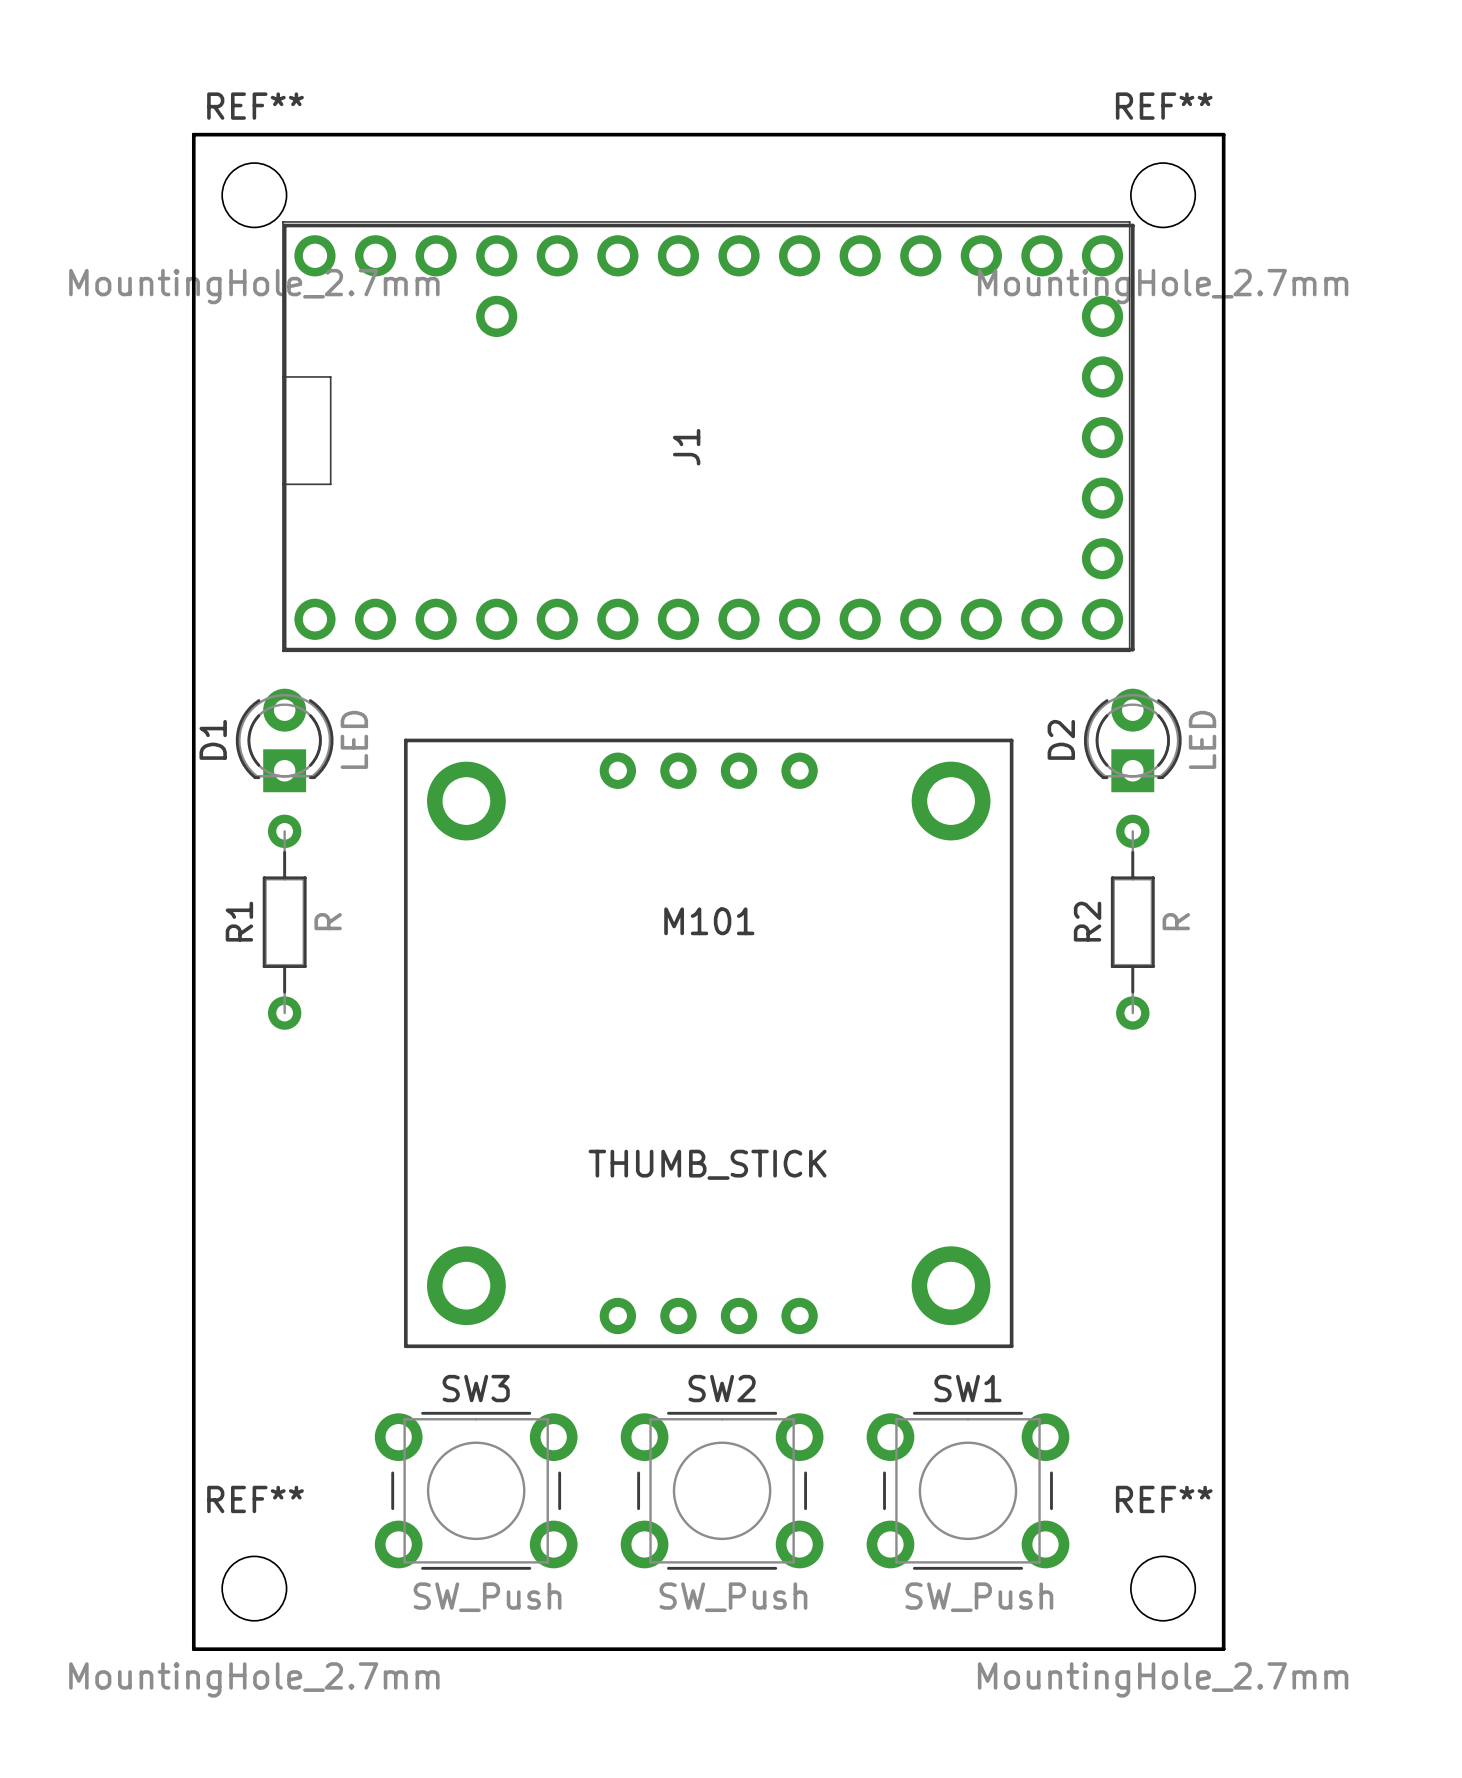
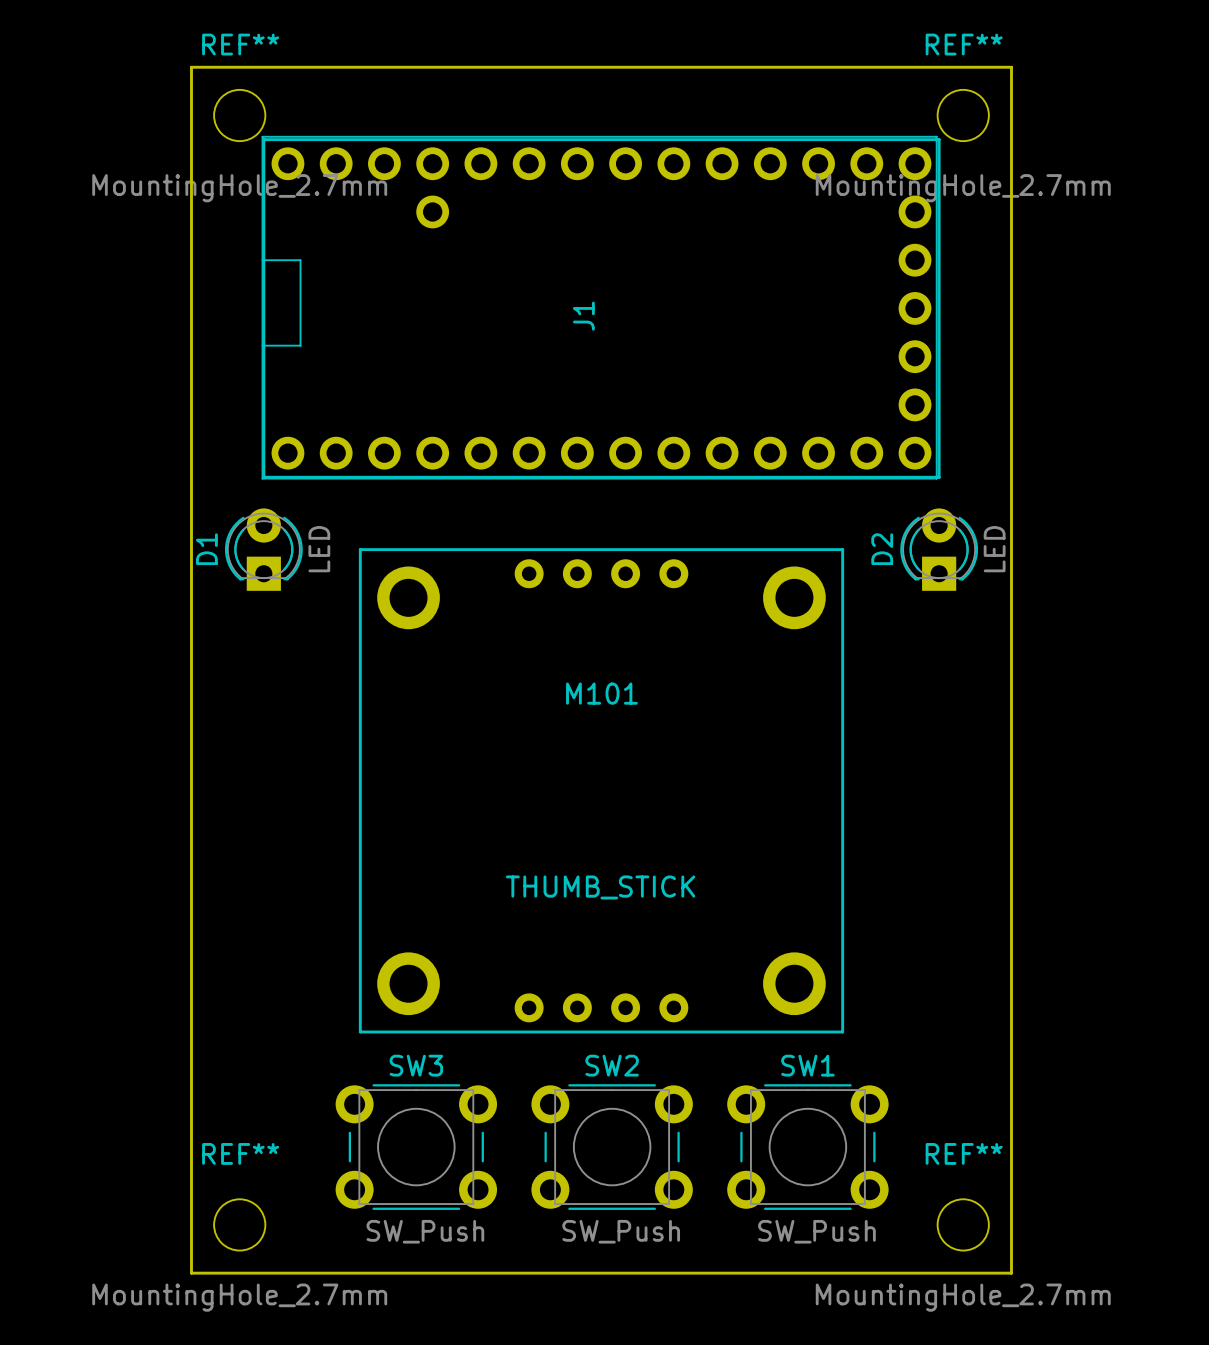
R1: R (284, 922) -> none
R2: R (1132, 922) -> none

